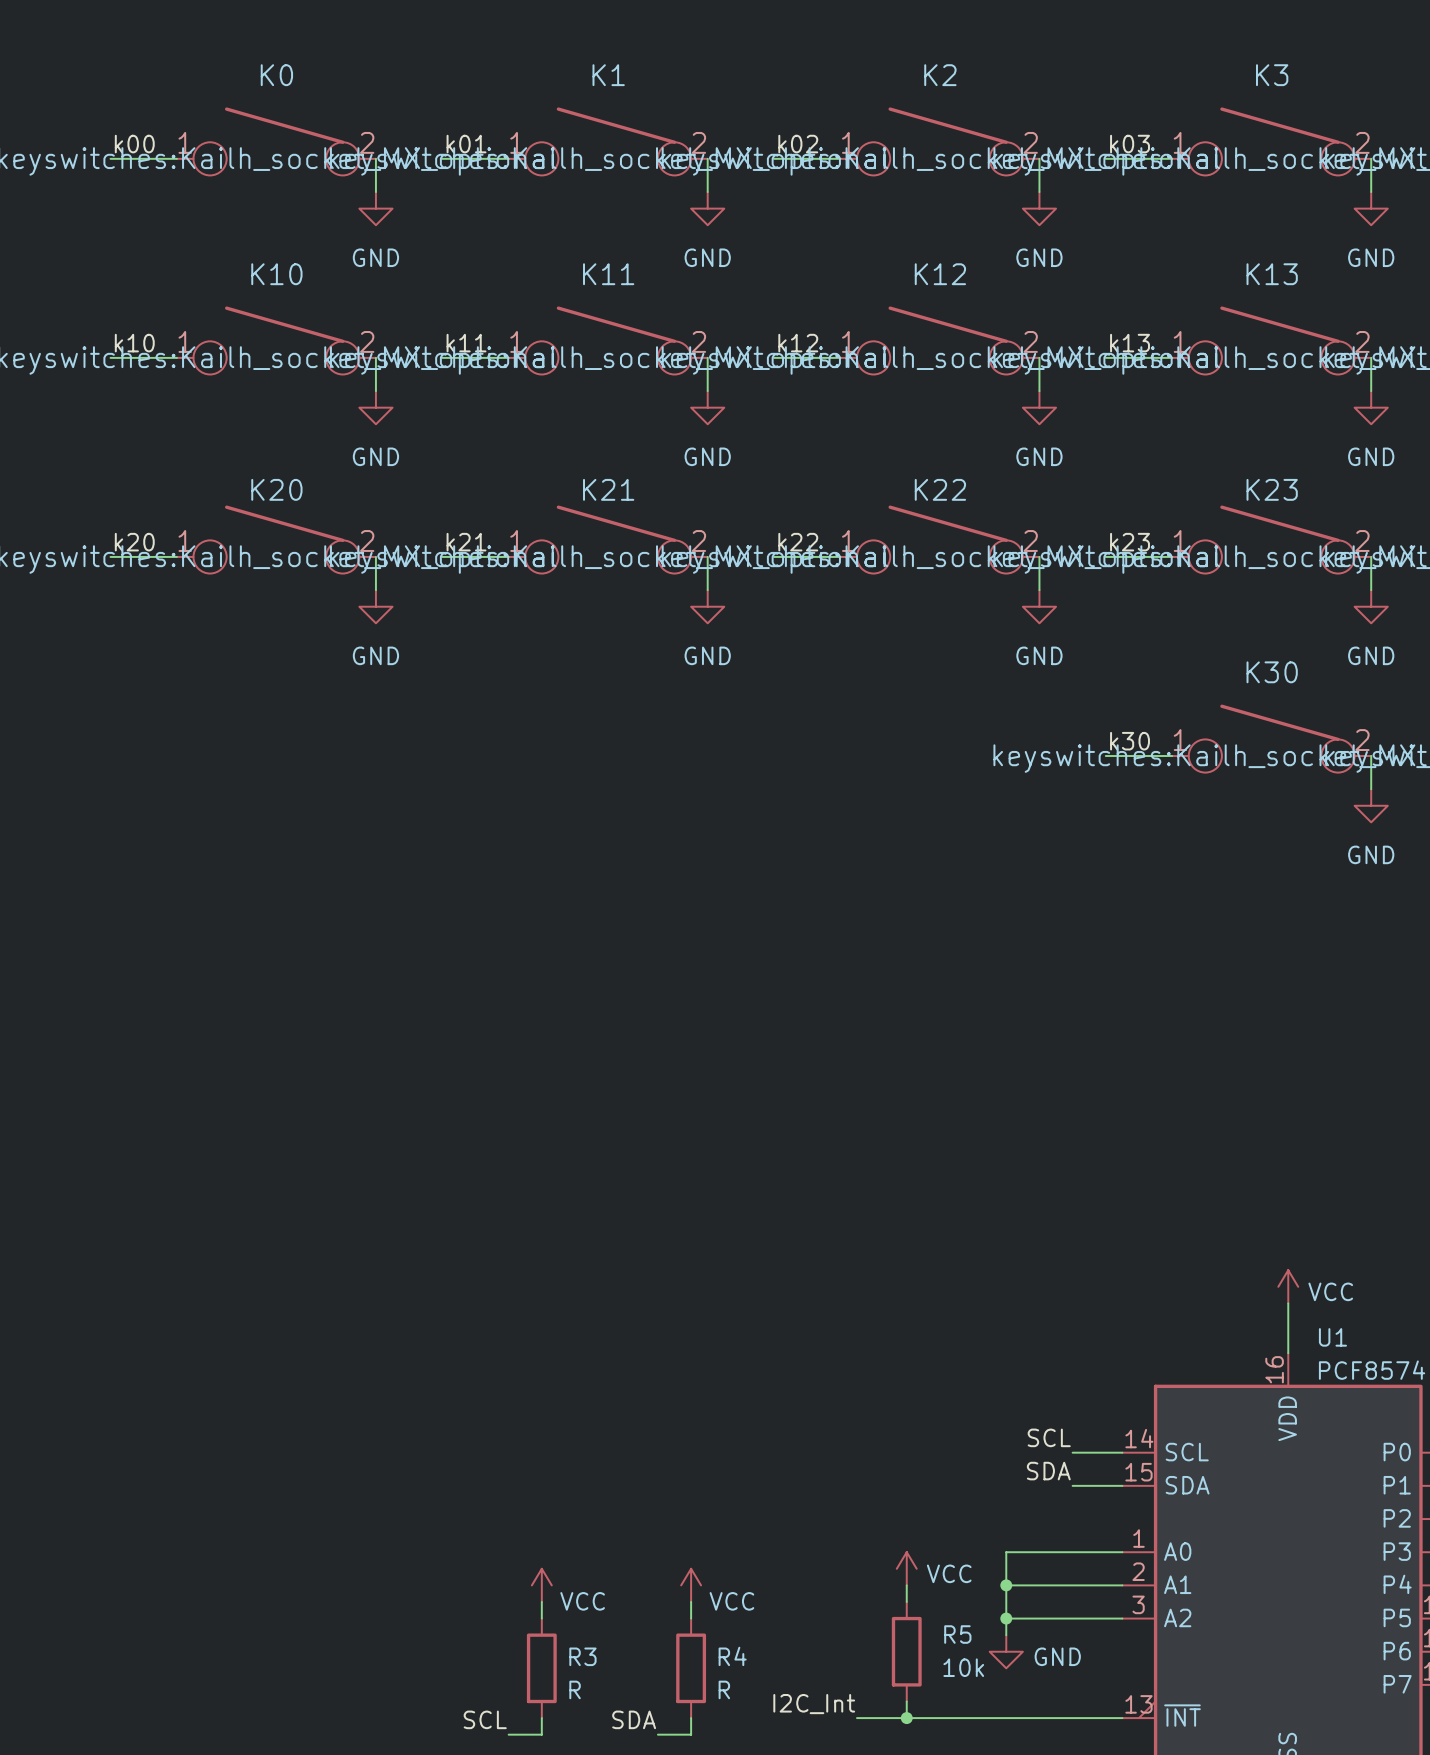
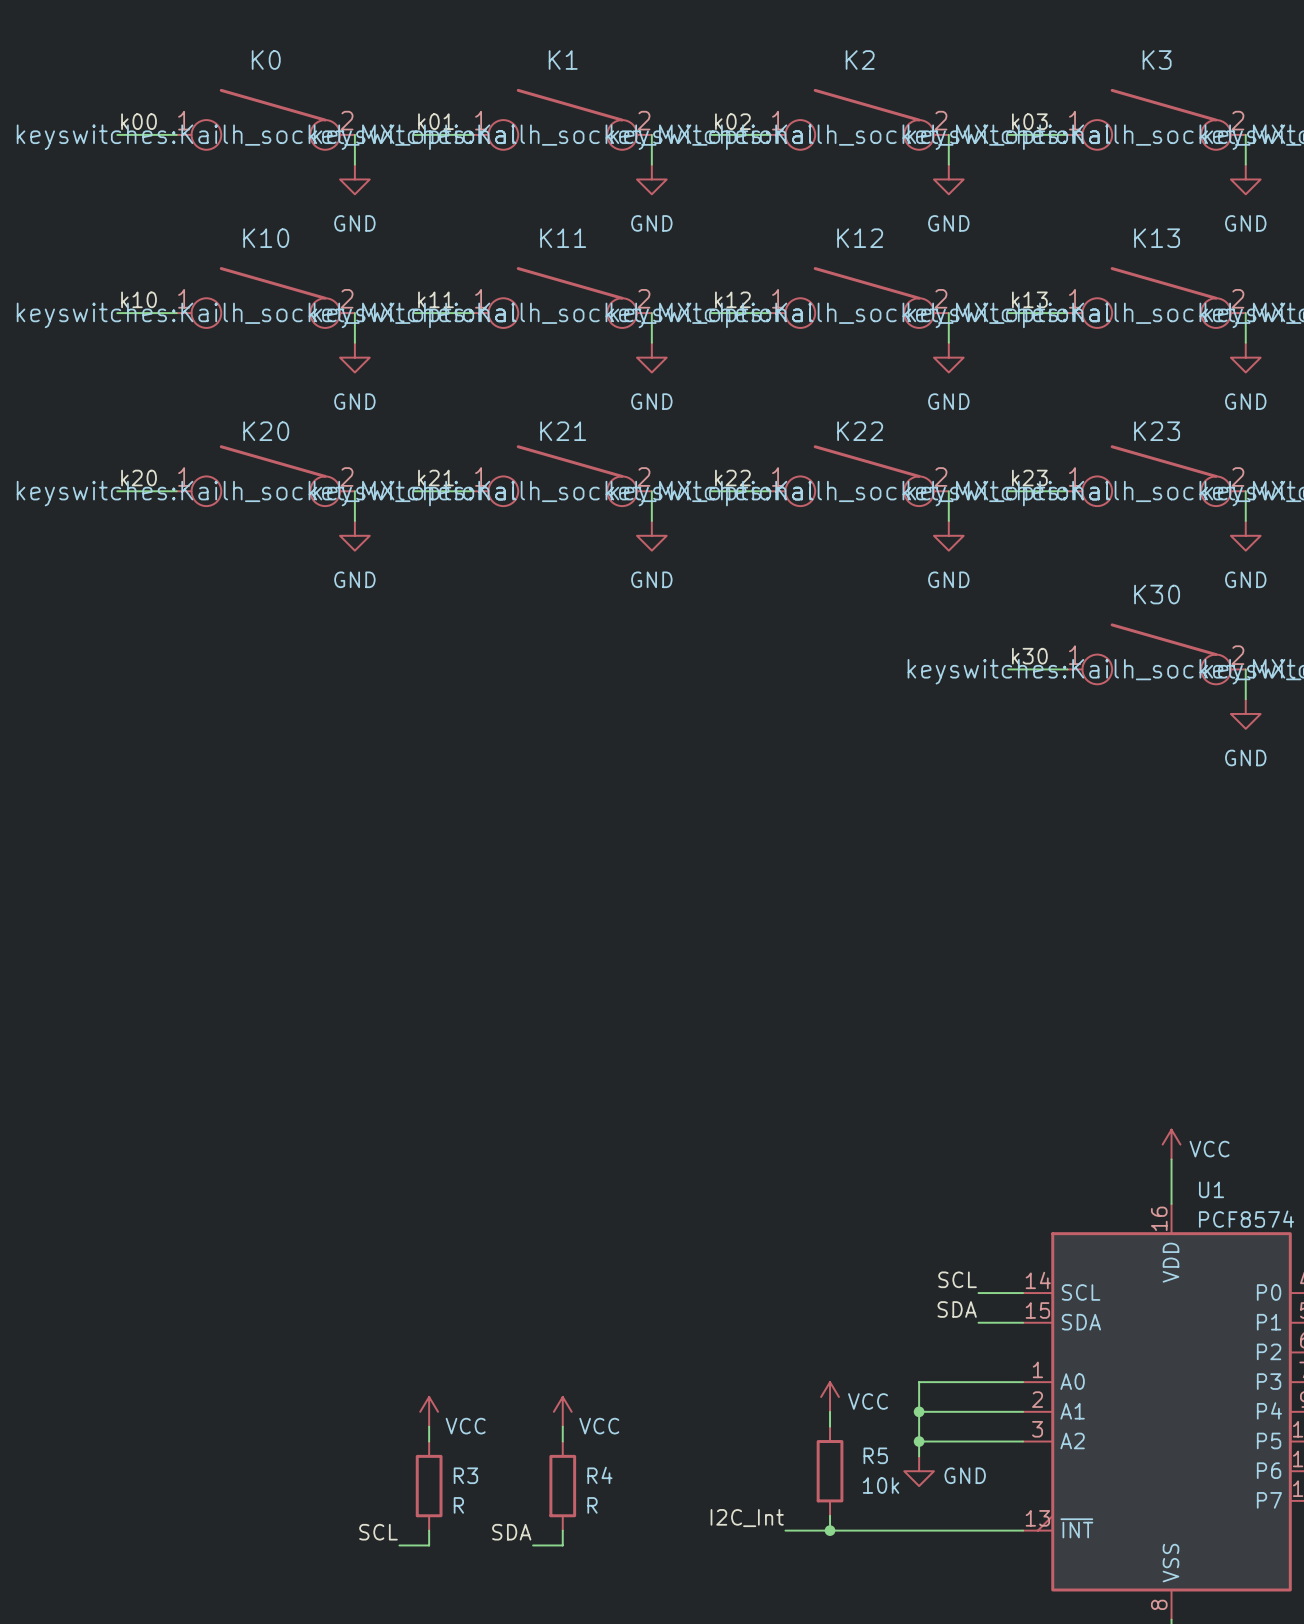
power symbol: none -> VCC (429, 1411)
power symbol: VCC (541, 1585) -> none
power symbol: none -> VCC (562, 1411)
power symbol: VCC (691, 1585) -> none
wire: (541, 1601) (541, 1618) -> (562, 1426) (562, 1441)
wire: (691, 1601) (691, 1618) -> (429, 1426) (429, 1441)
R3 position: (541, 1668) -> (429, 1486)
R4 position: (691, 1668) -> (562, 1486)
wire: (541, 1718) (541, 1734) (508, 1734) -> (562, 1530) (562, 1545) (533, 1545)
wire: (691, 1718) (691, 1734) (657, 1734) -> (429, 1530) (429, 1545) (399, 1545)
label position: SCL (485, 1719) -> SCL (378, 1532)
label position: SDA (634, 1719) -> SDA (511, 1532)

